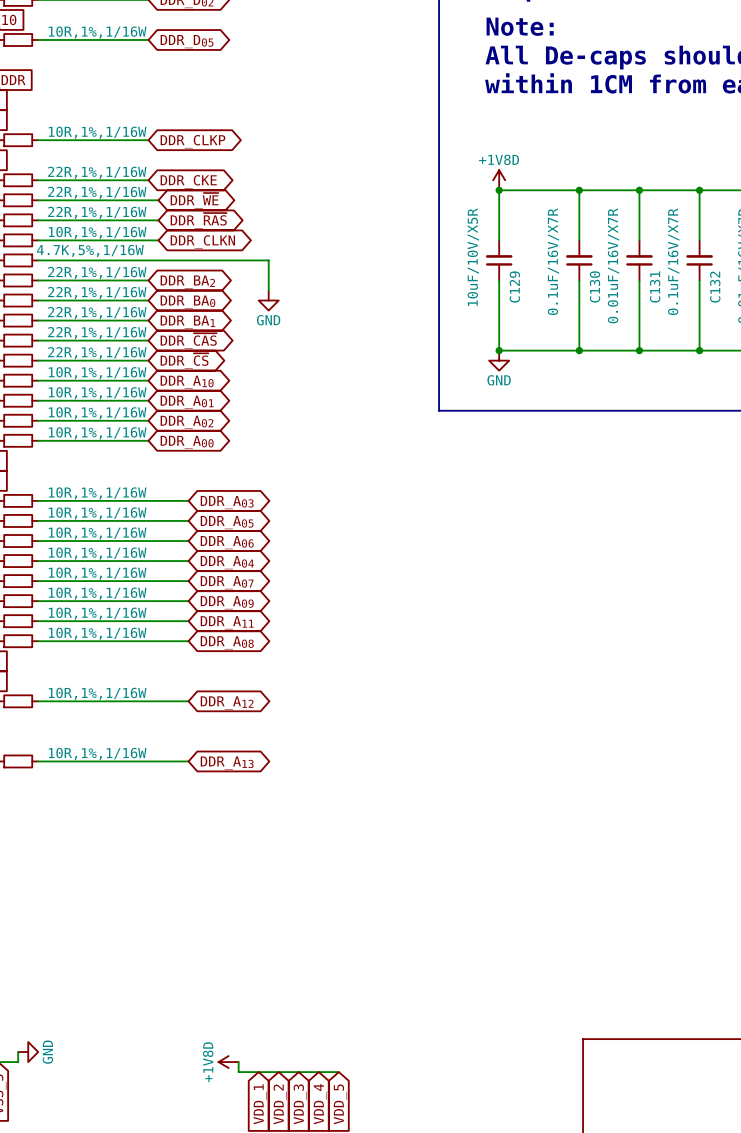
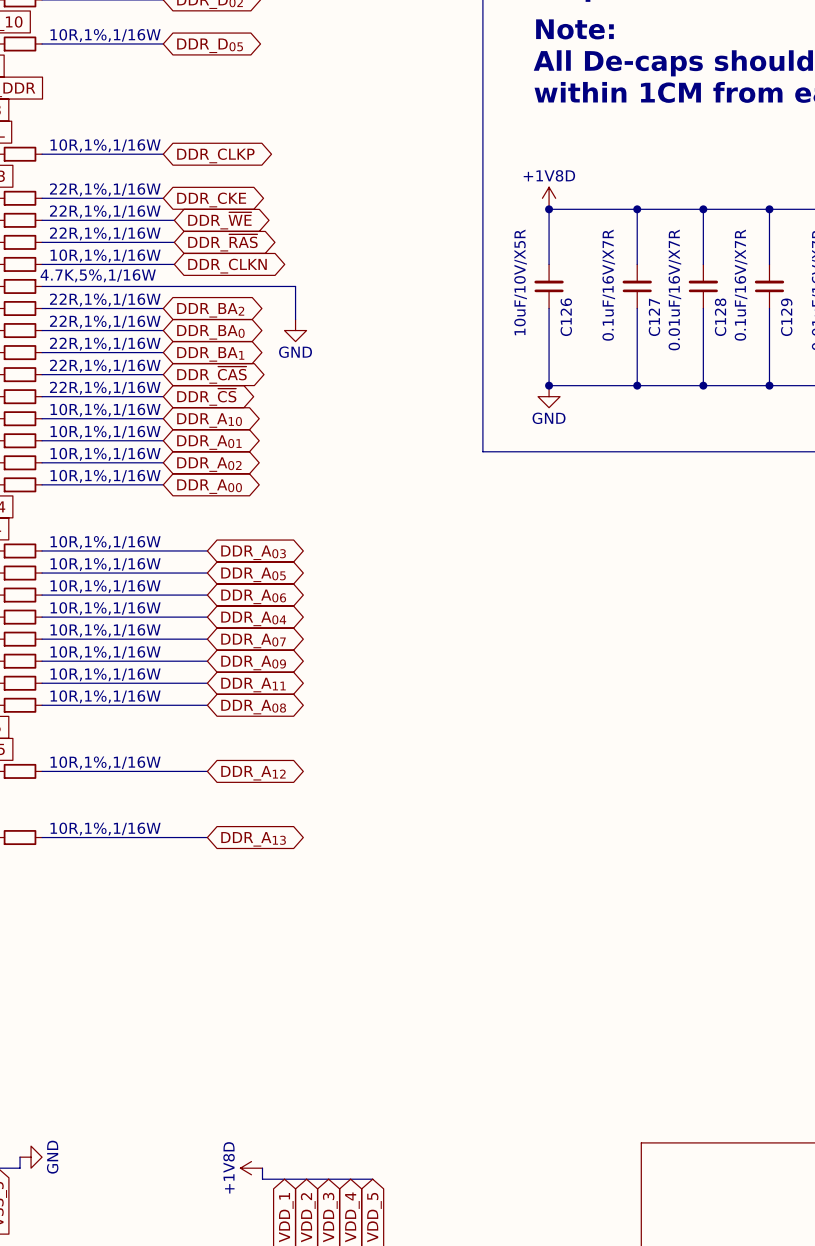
C130 name: C130 (595, 286) -> C127 (654, 317)
C129 name: C129 (514, 287) -> C126 (566, 317)
C131 name: C131 (655, 287) -> C128 (720, 317)
C132 name: C132 (715, 287) -> C129 (786, 317)

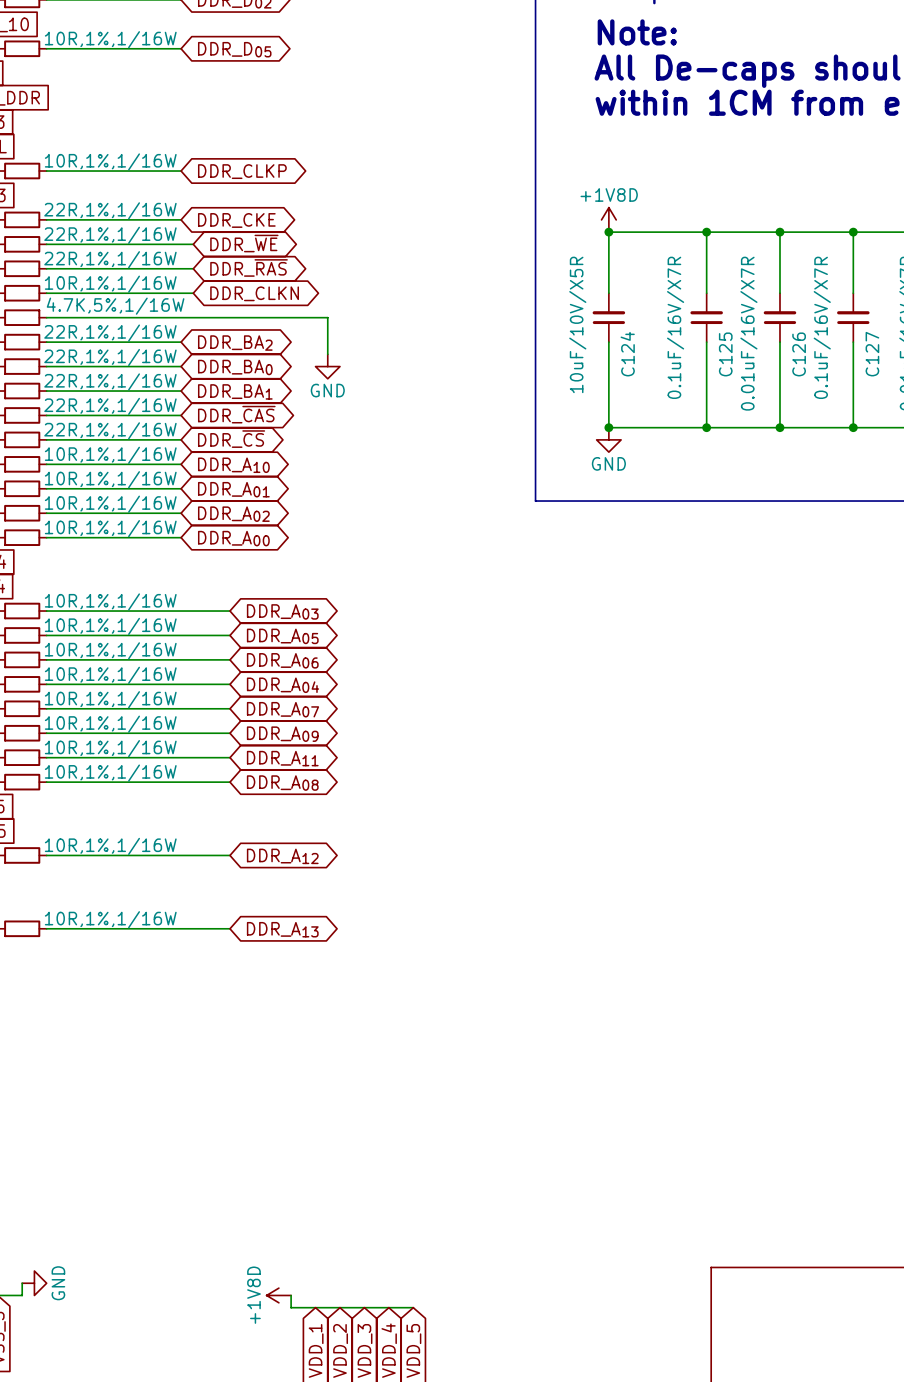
C126 name: C126 (566, 317) -> C124 (627, 354)
C127 name: C127 (654, 317) -> C125 (725, 354)
C128 name: C128 (720, 317) -> C126 (799, 354)
C129 name: C129 (786, 317) -> C127 (872, 354)

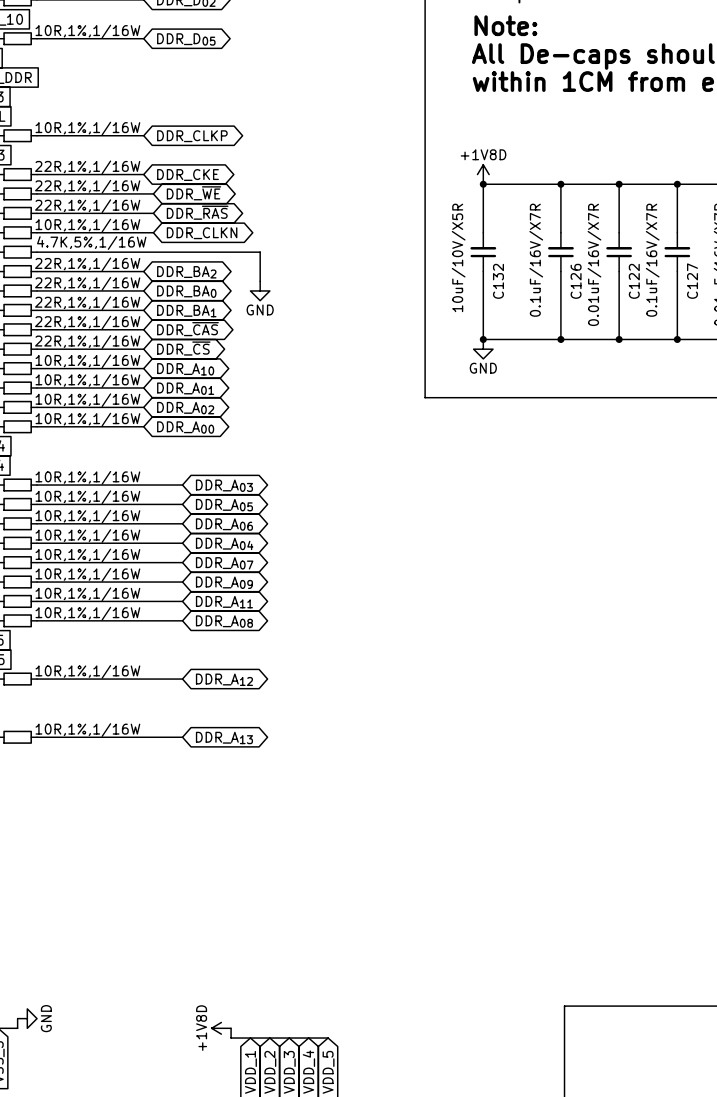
C124 name: C124 (627, 354) -> C132 (498, 281)
C125 name: C125 (725, 354) -> C126 (576, 281)
C126 name: C126 (799, 354) -> C122 (634, 281)

